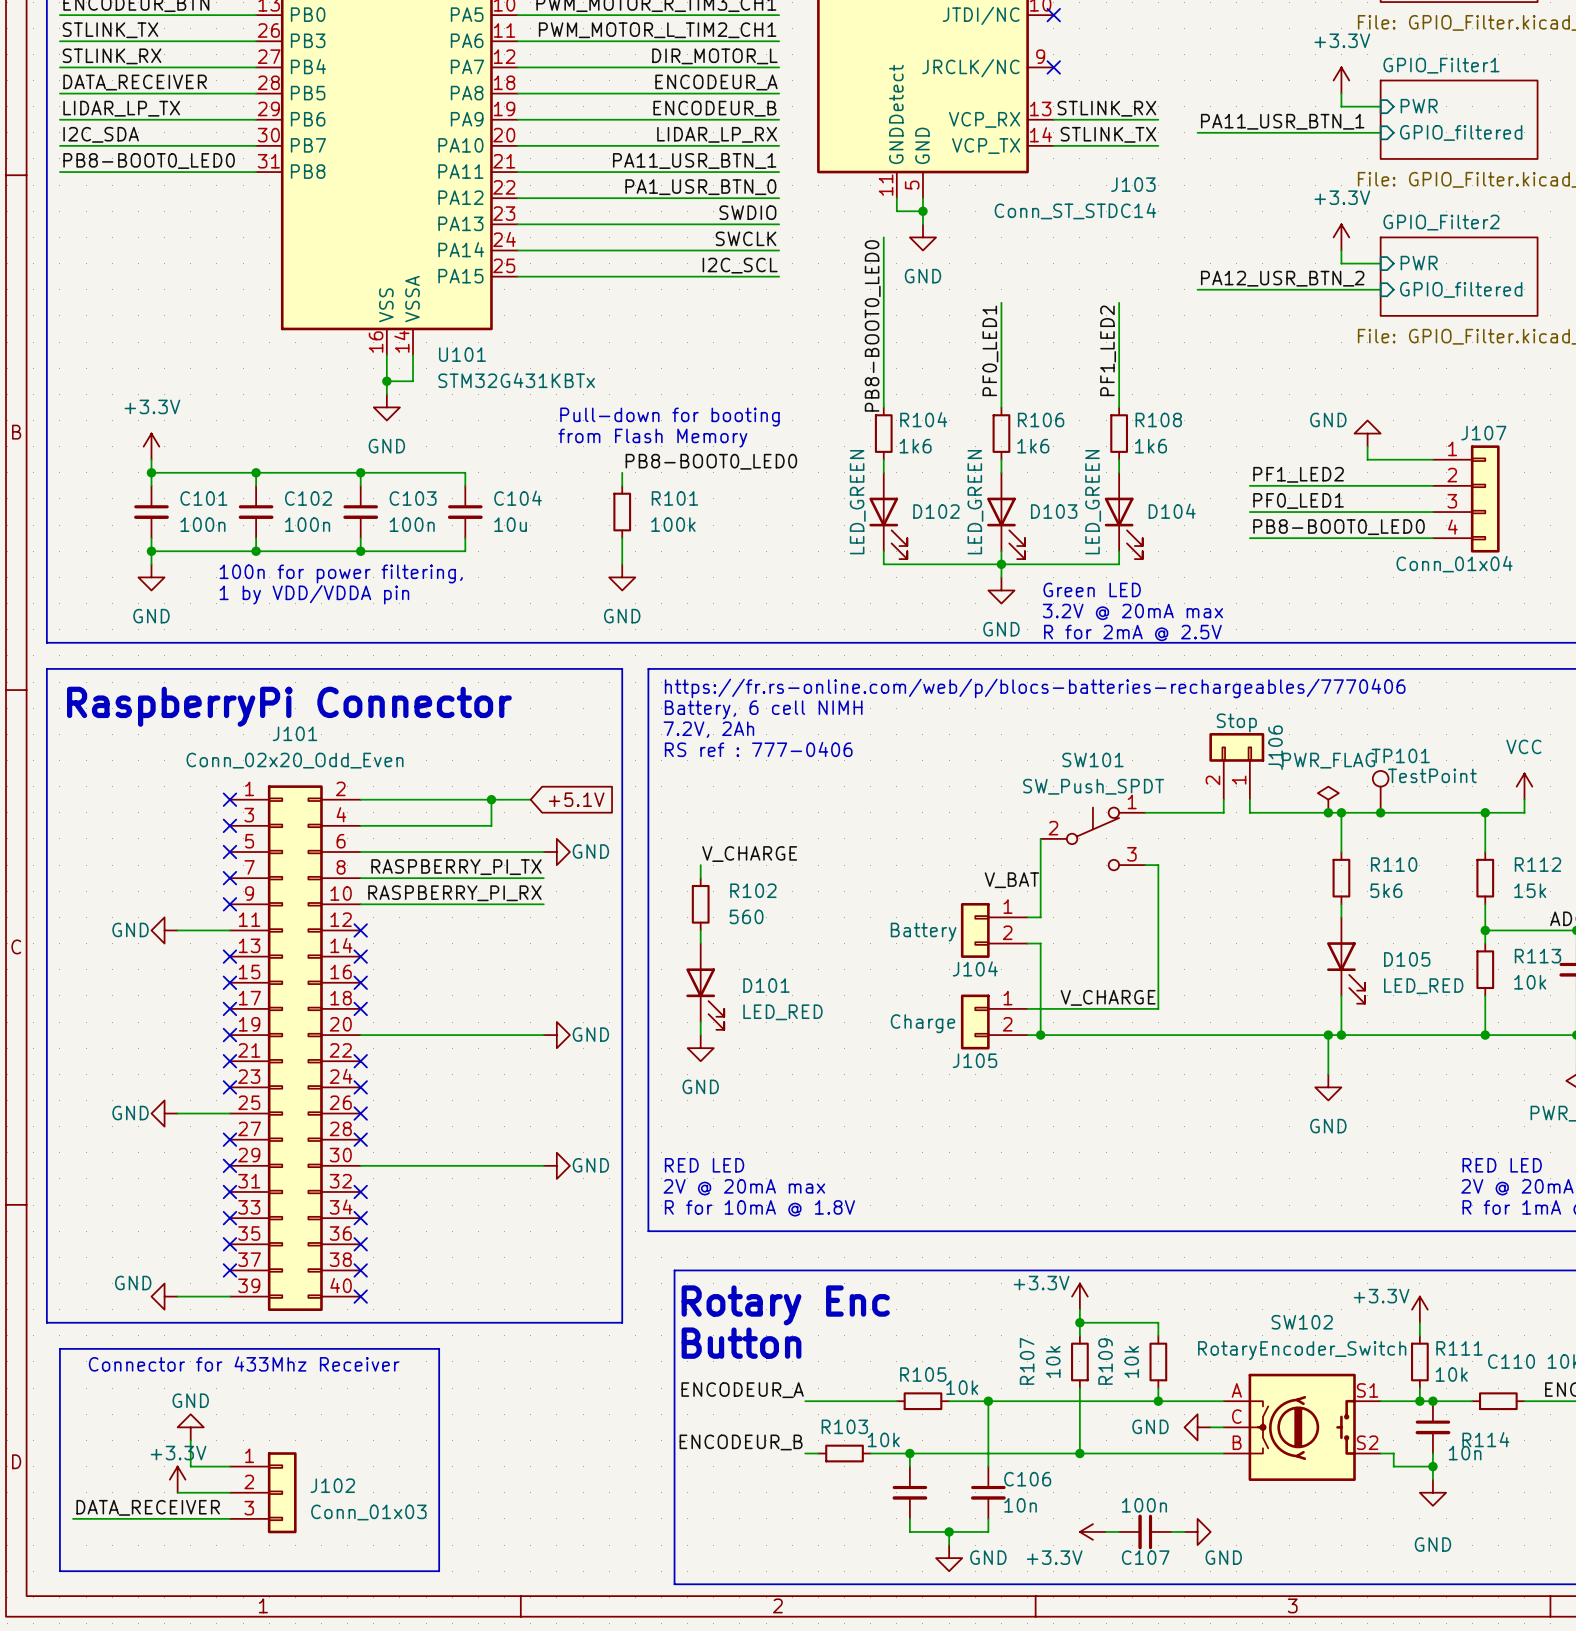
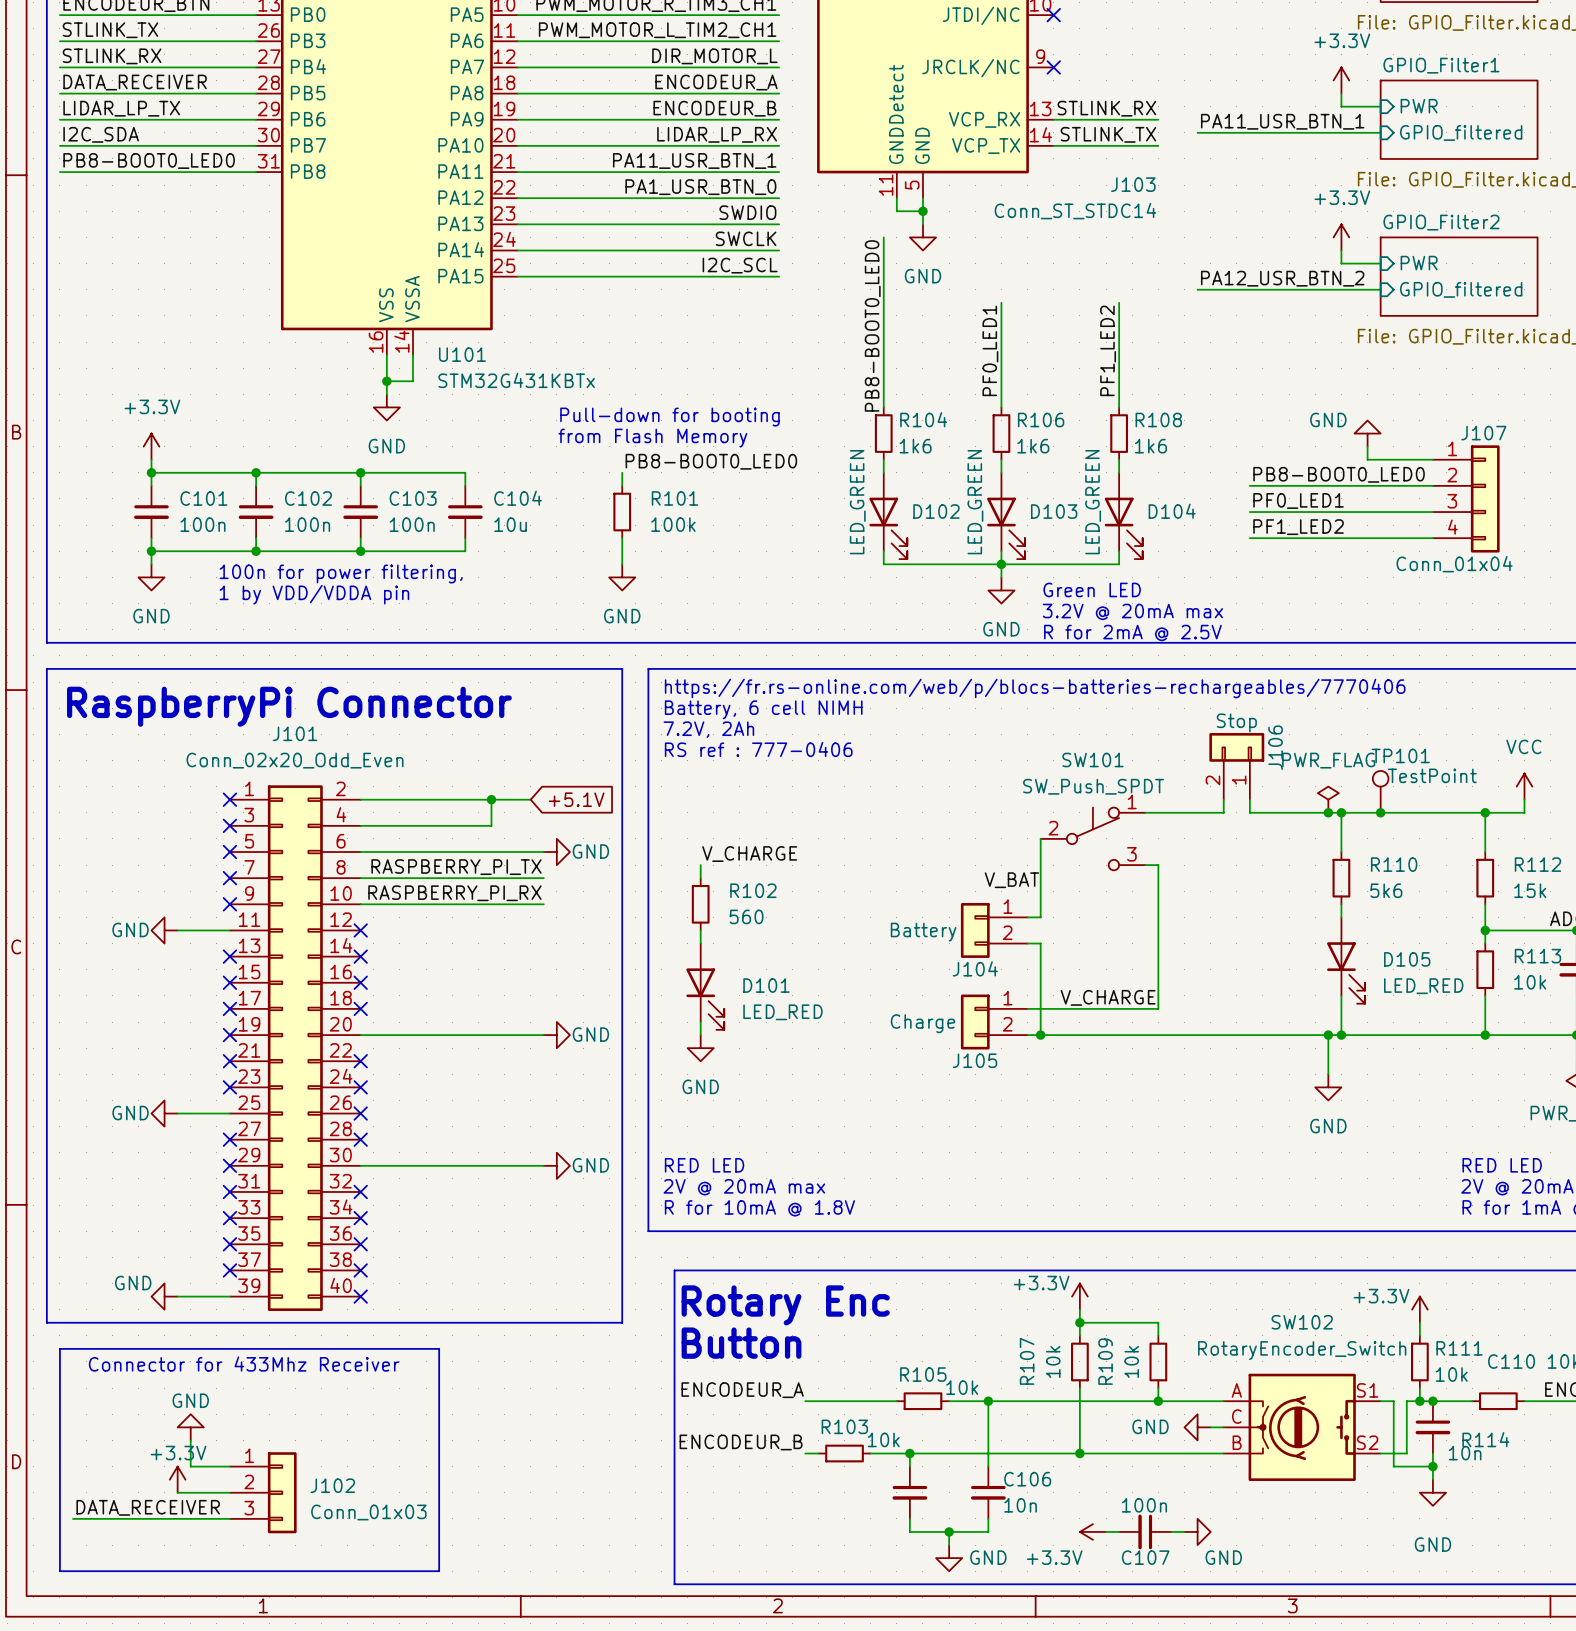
label: PF1_LED2 (1298, 474) -> PB8-BOOT0_LED0 (1339, 474)
label: PB8-BOOT0_LED0 (1339, 527) -> PF1_LED2 (1298, 527)
wire: (1393, 1401) (1406, 1401) -> (1393, 1401) (1393, 1453) (1406, 1453) (1406, 1401)

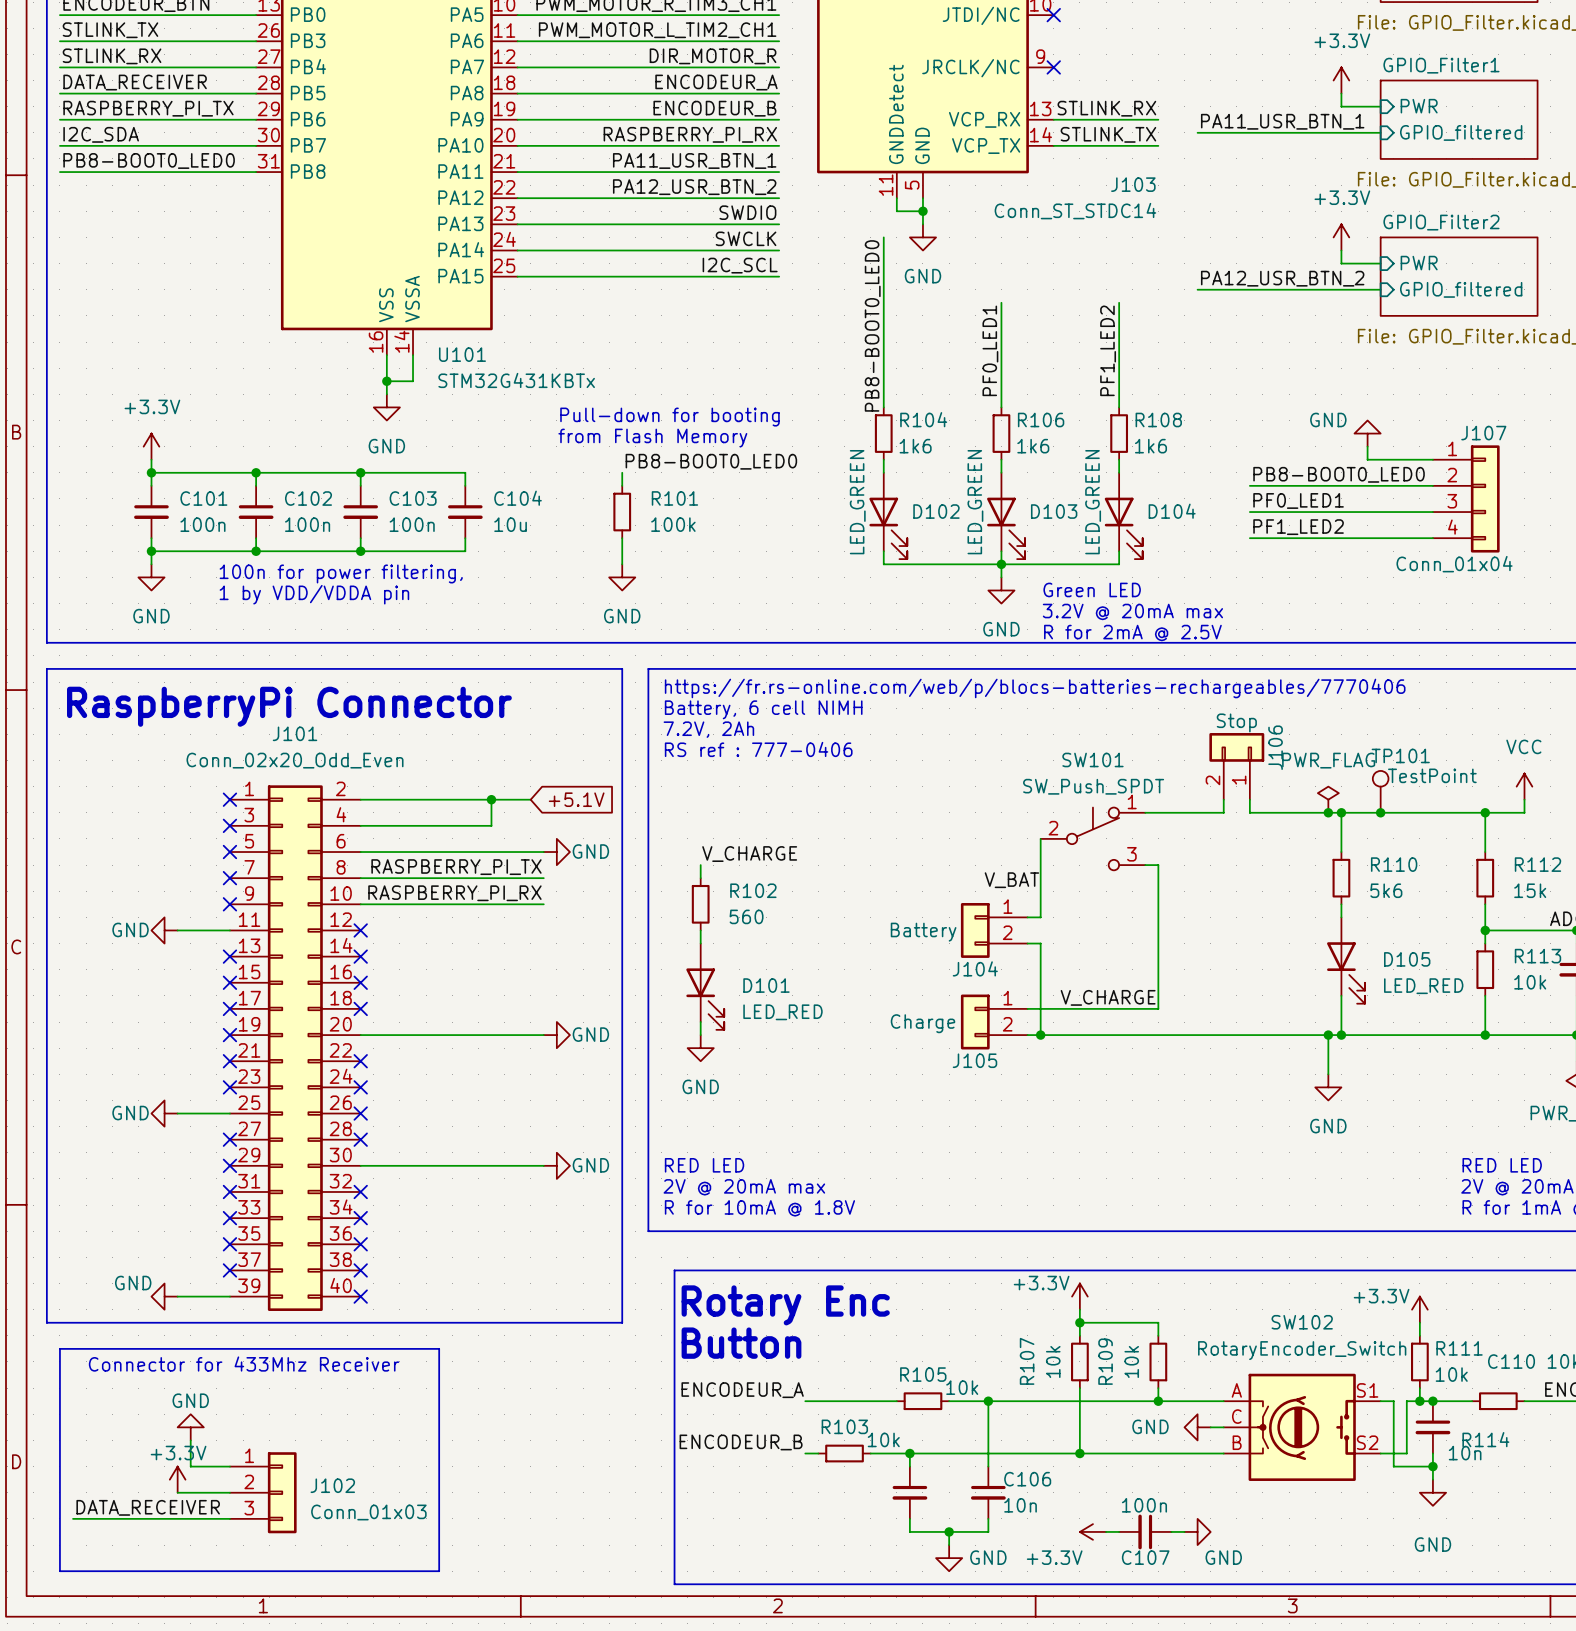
label: DIR_MOTOR_L (714, 56) -> DIR_MOTOR_R (713, 56)
label: LIDAR_LP_TX (121, 108) -> RASPBERRY_PI_TX (148, 108)
label: LIDAR_LP_RX (717, 134) -> RASPBERRY_PI_RX (690, 134)
label: PA1_USR_BTN_0 (700, 187) -> PA12_USR_BTN_2 (694, 187)

